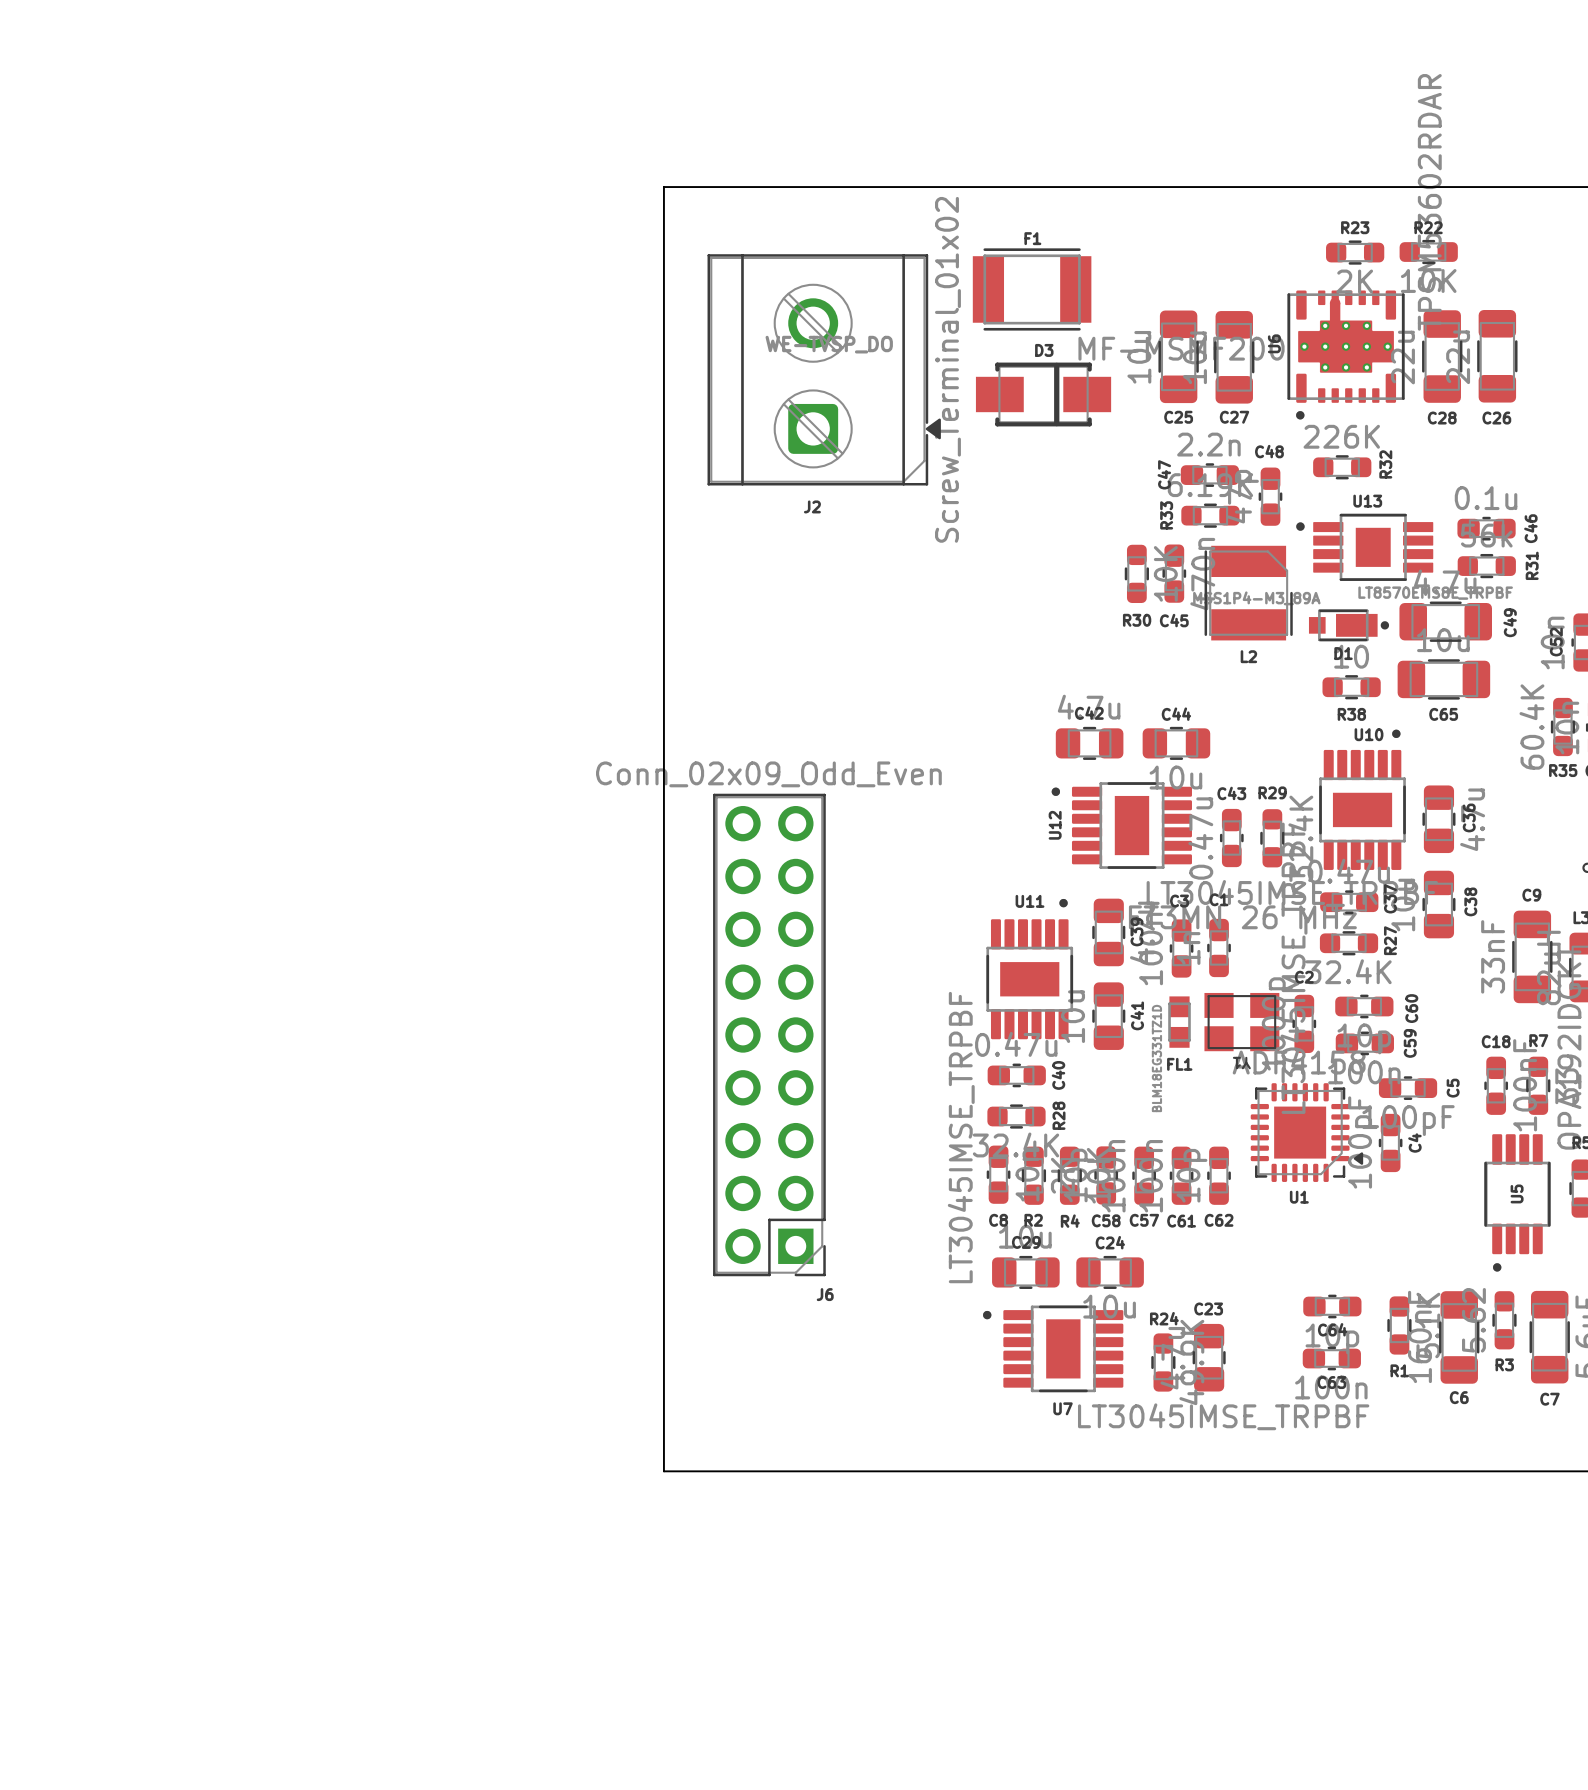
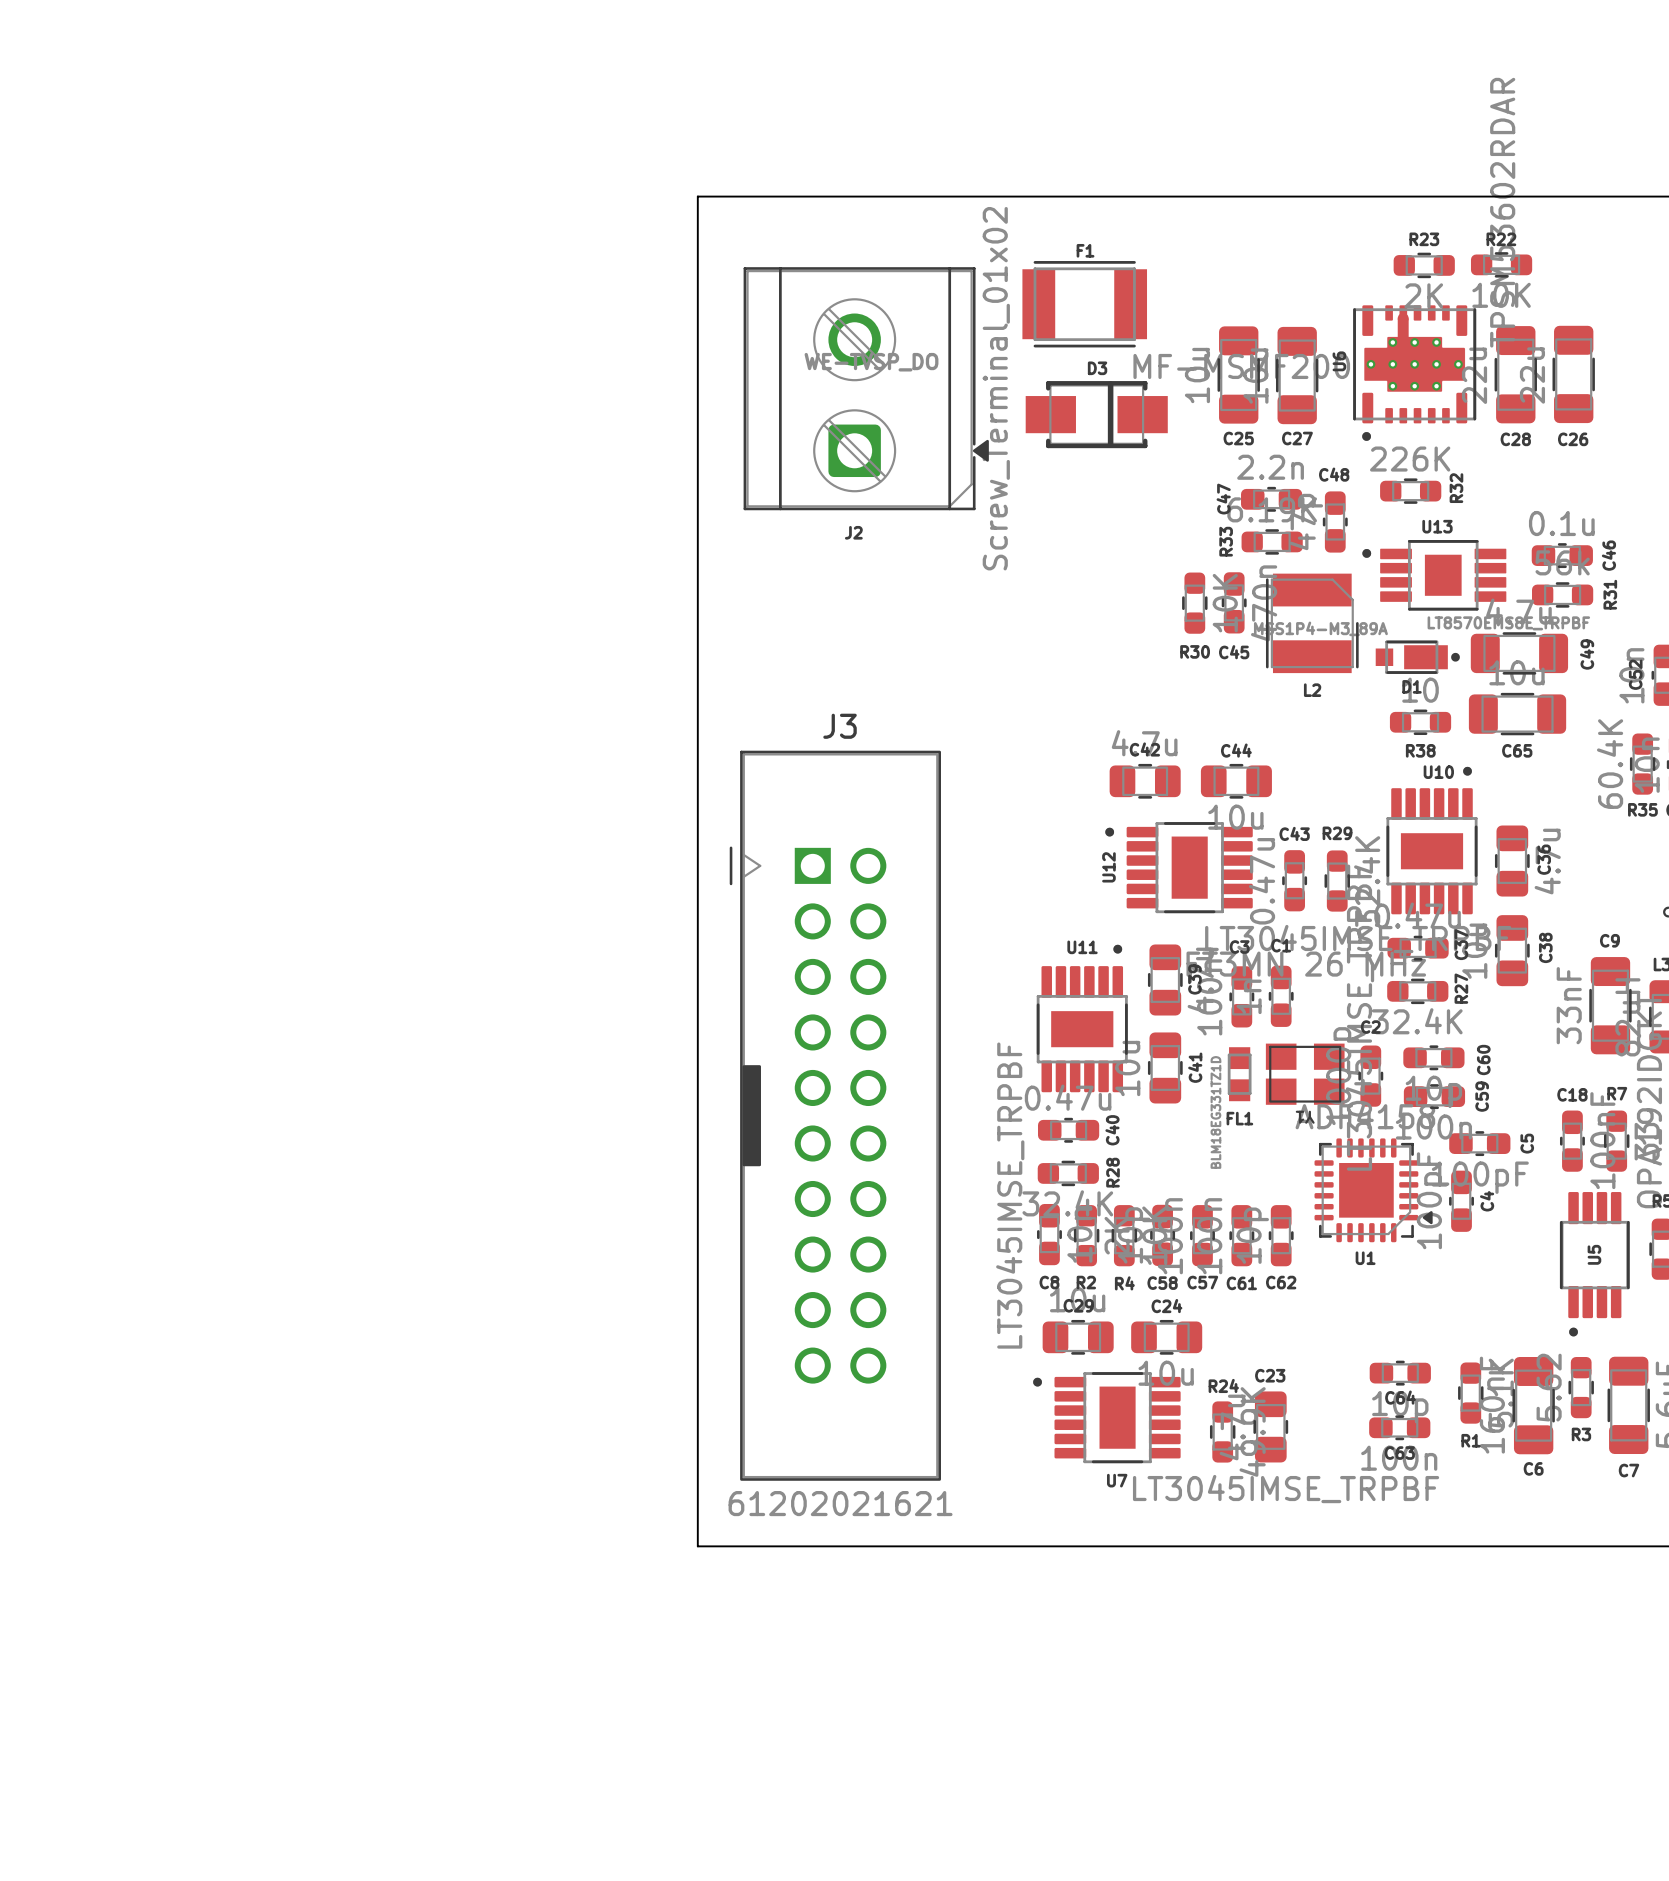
J6: Conn_02x09_Odd_Even (769, 1034) -> none
J3: none -> 61202021621 (835, 1115)

